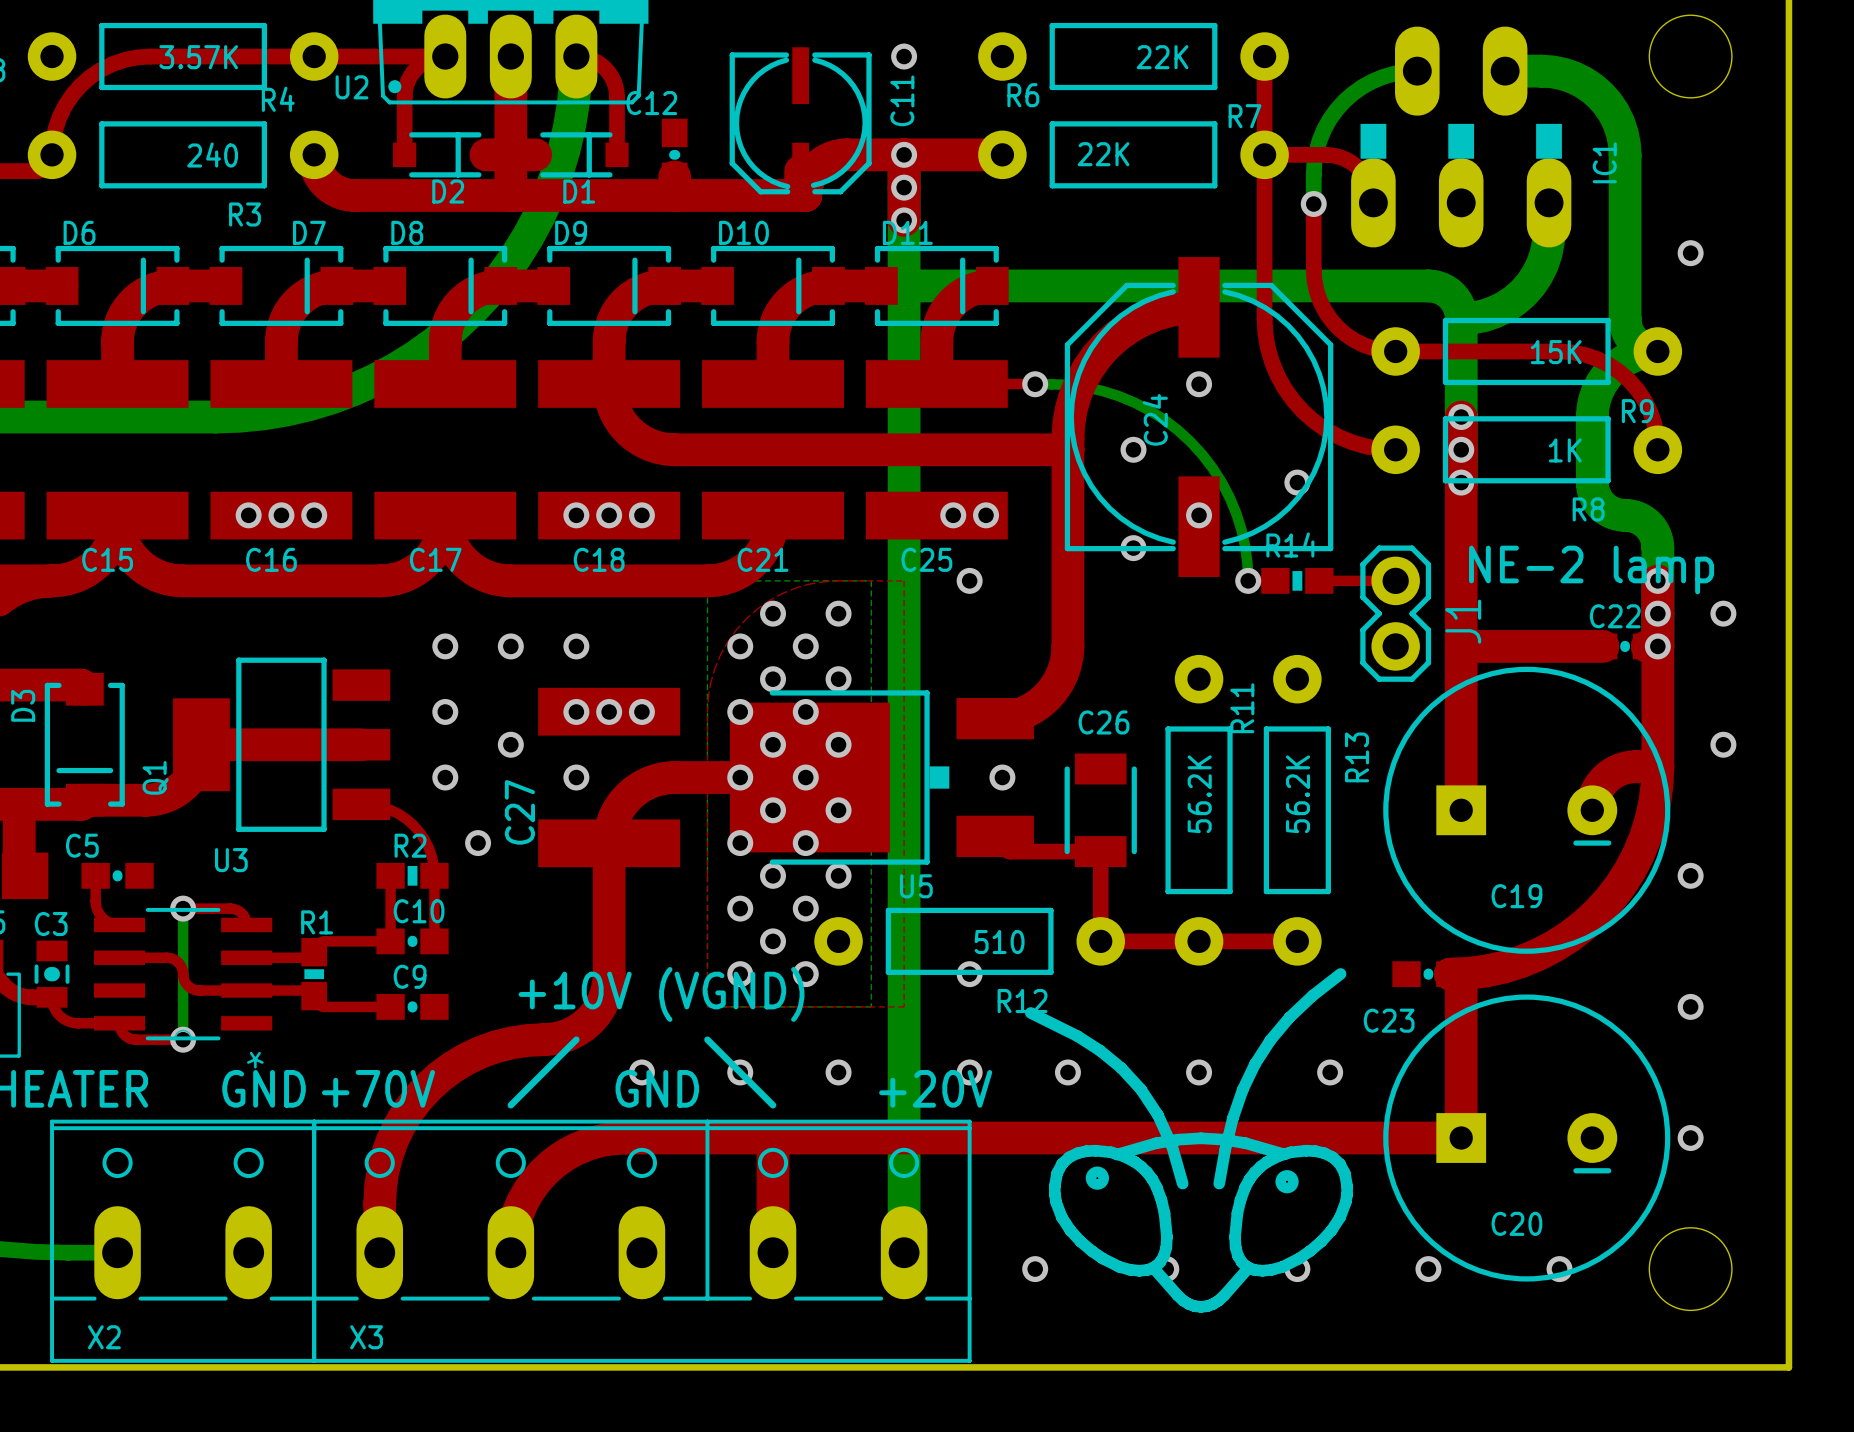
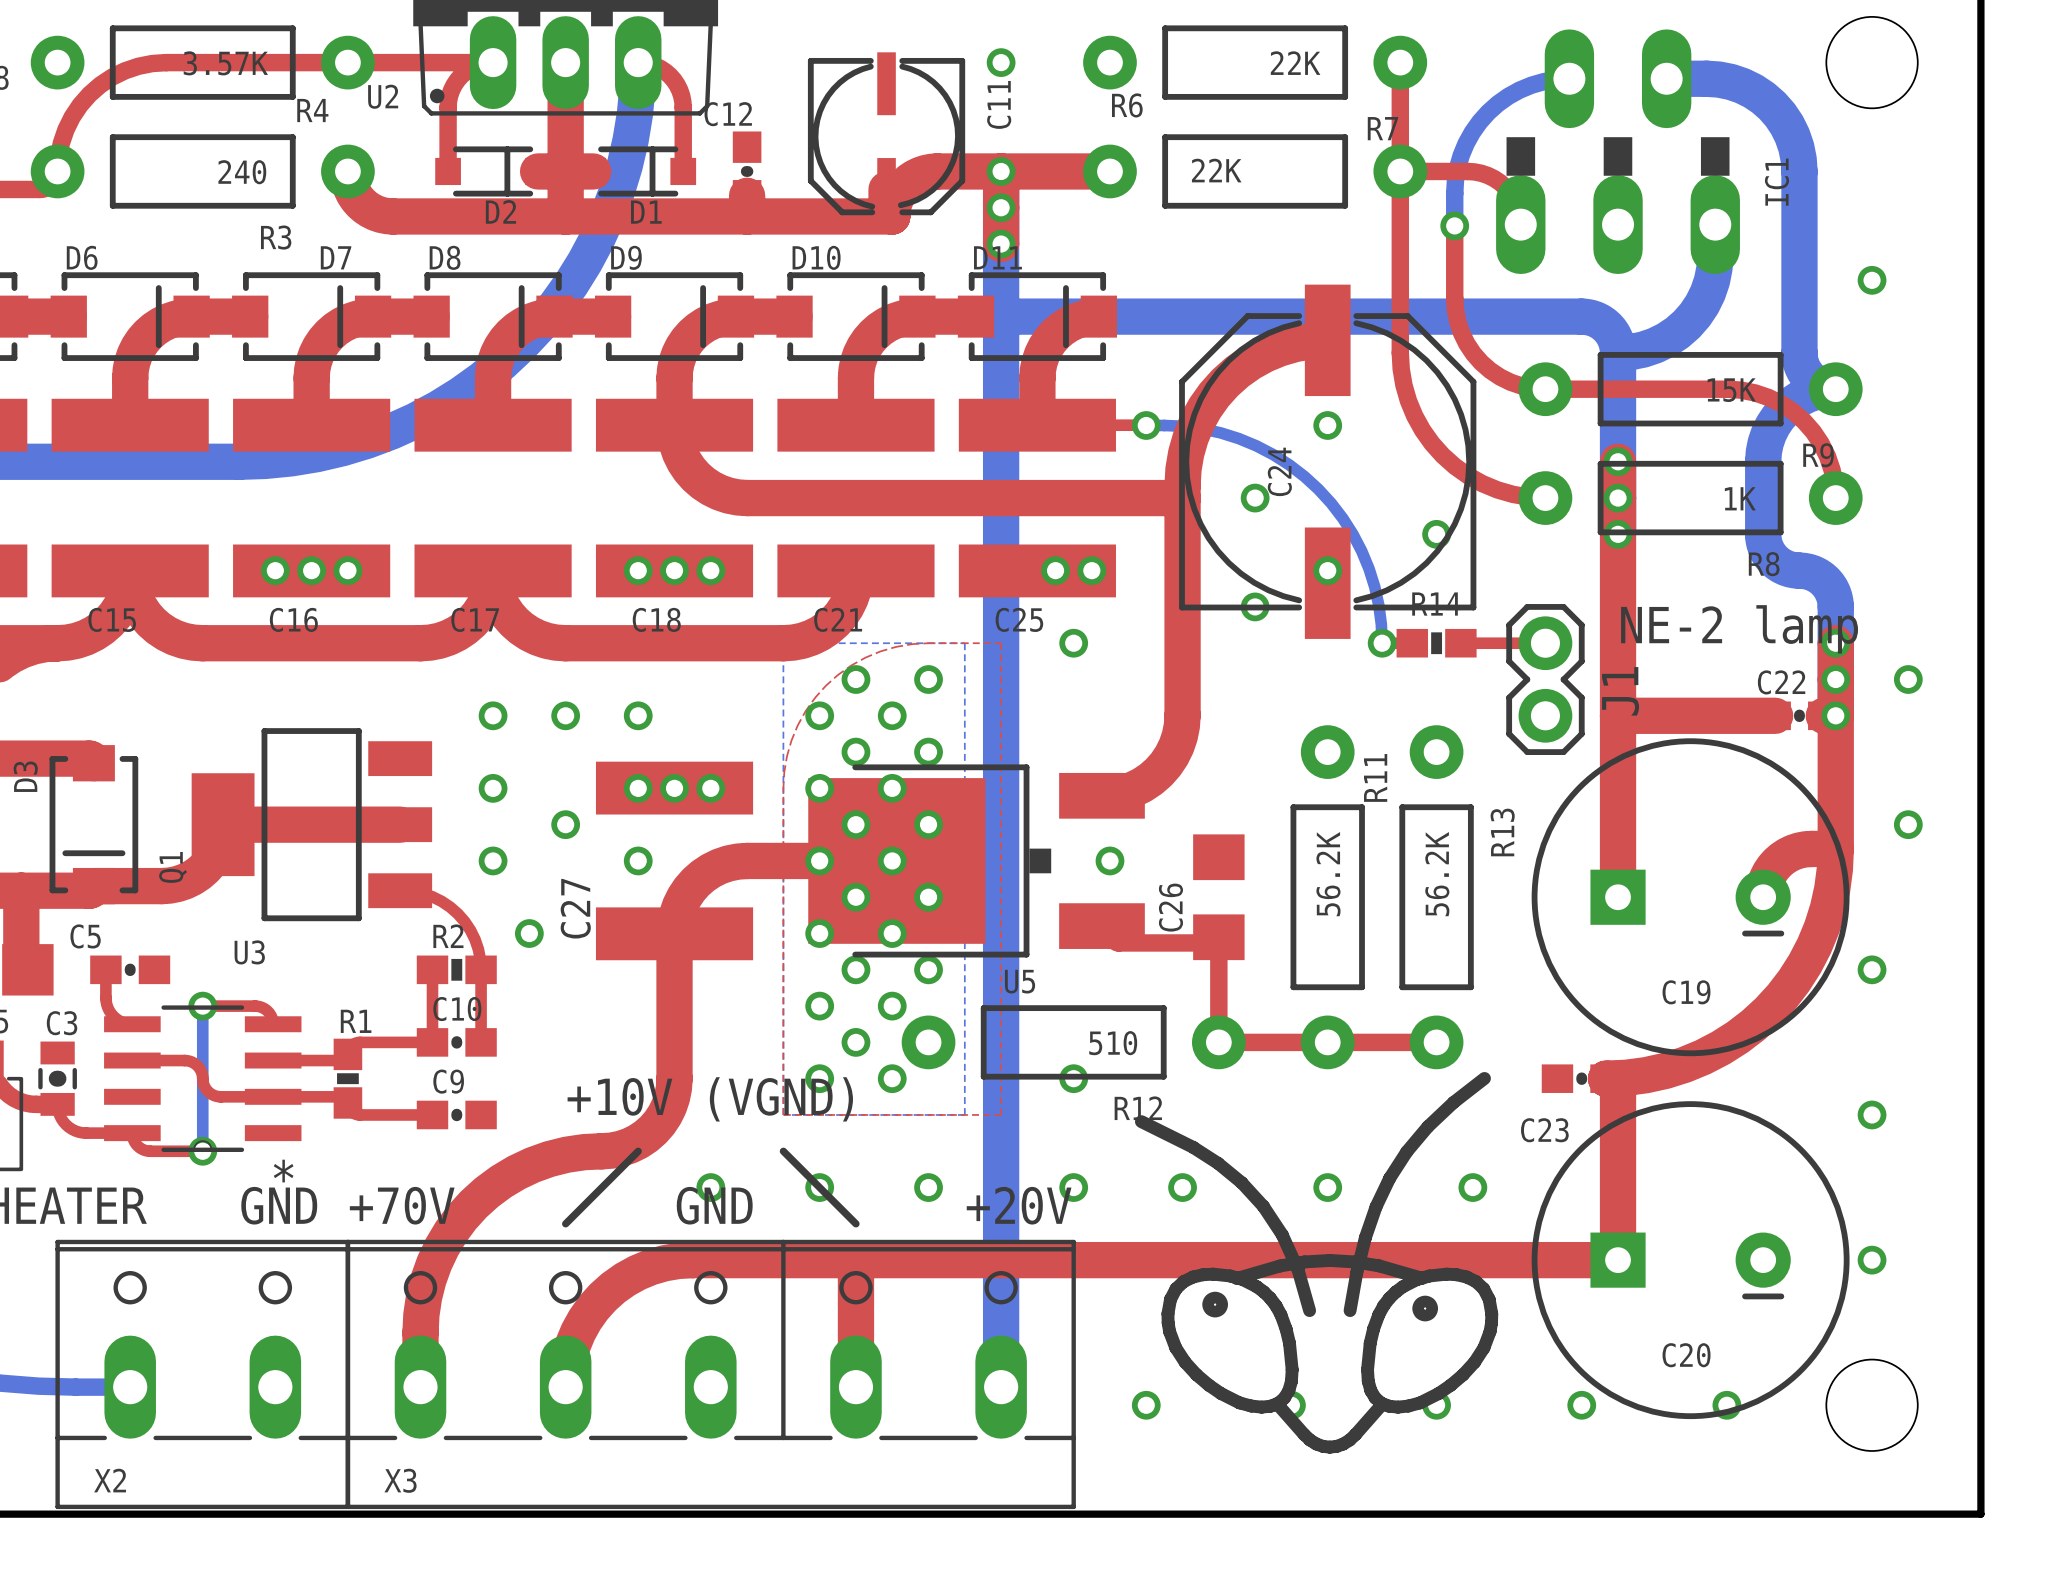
C26 name position: C26 (1104, 722) -> C26 (1170, 907)
C26 footprint: [1064, 753, 1137, 868] -> [1193, 834, 1245, 961]

